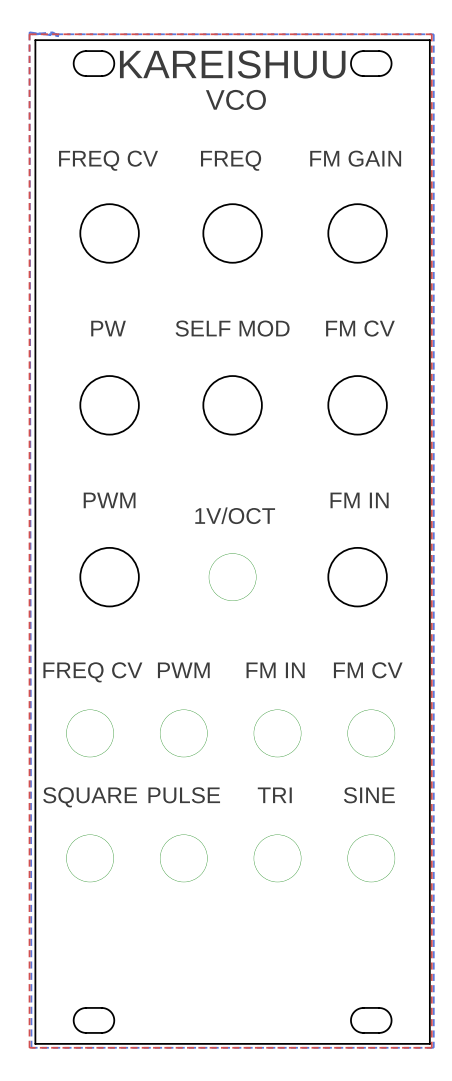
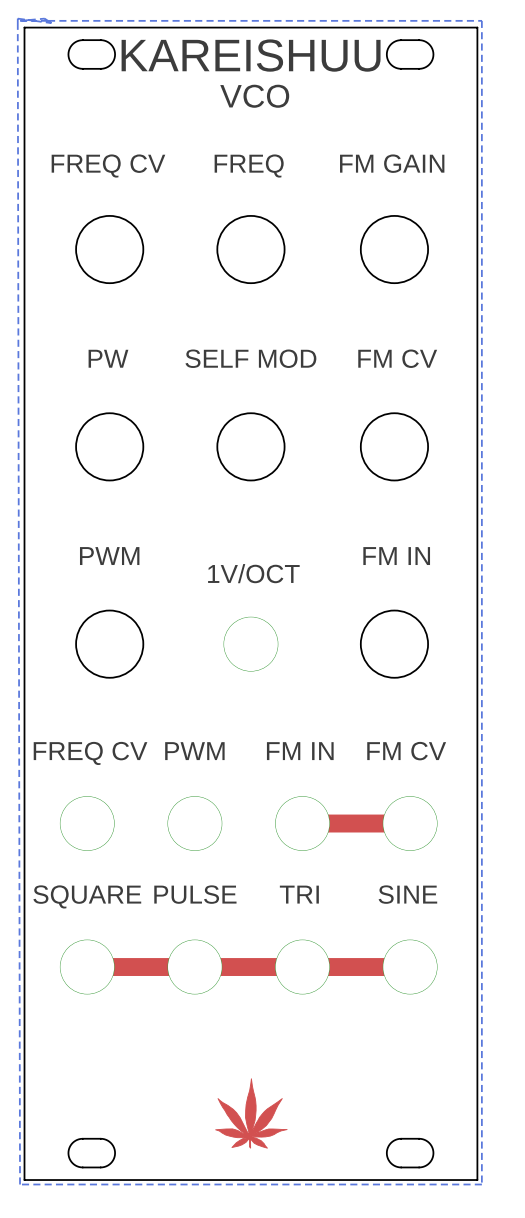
top zone outline: (29, 34) (29, 1047) (431, 1047) (431, 34) (29, 34) -> none
top track: none -> (302, 823) (407, 823)
top track: none -> (87, 967) (407, 967)
drawing: none -> [215, 1078, 288, 1149]

